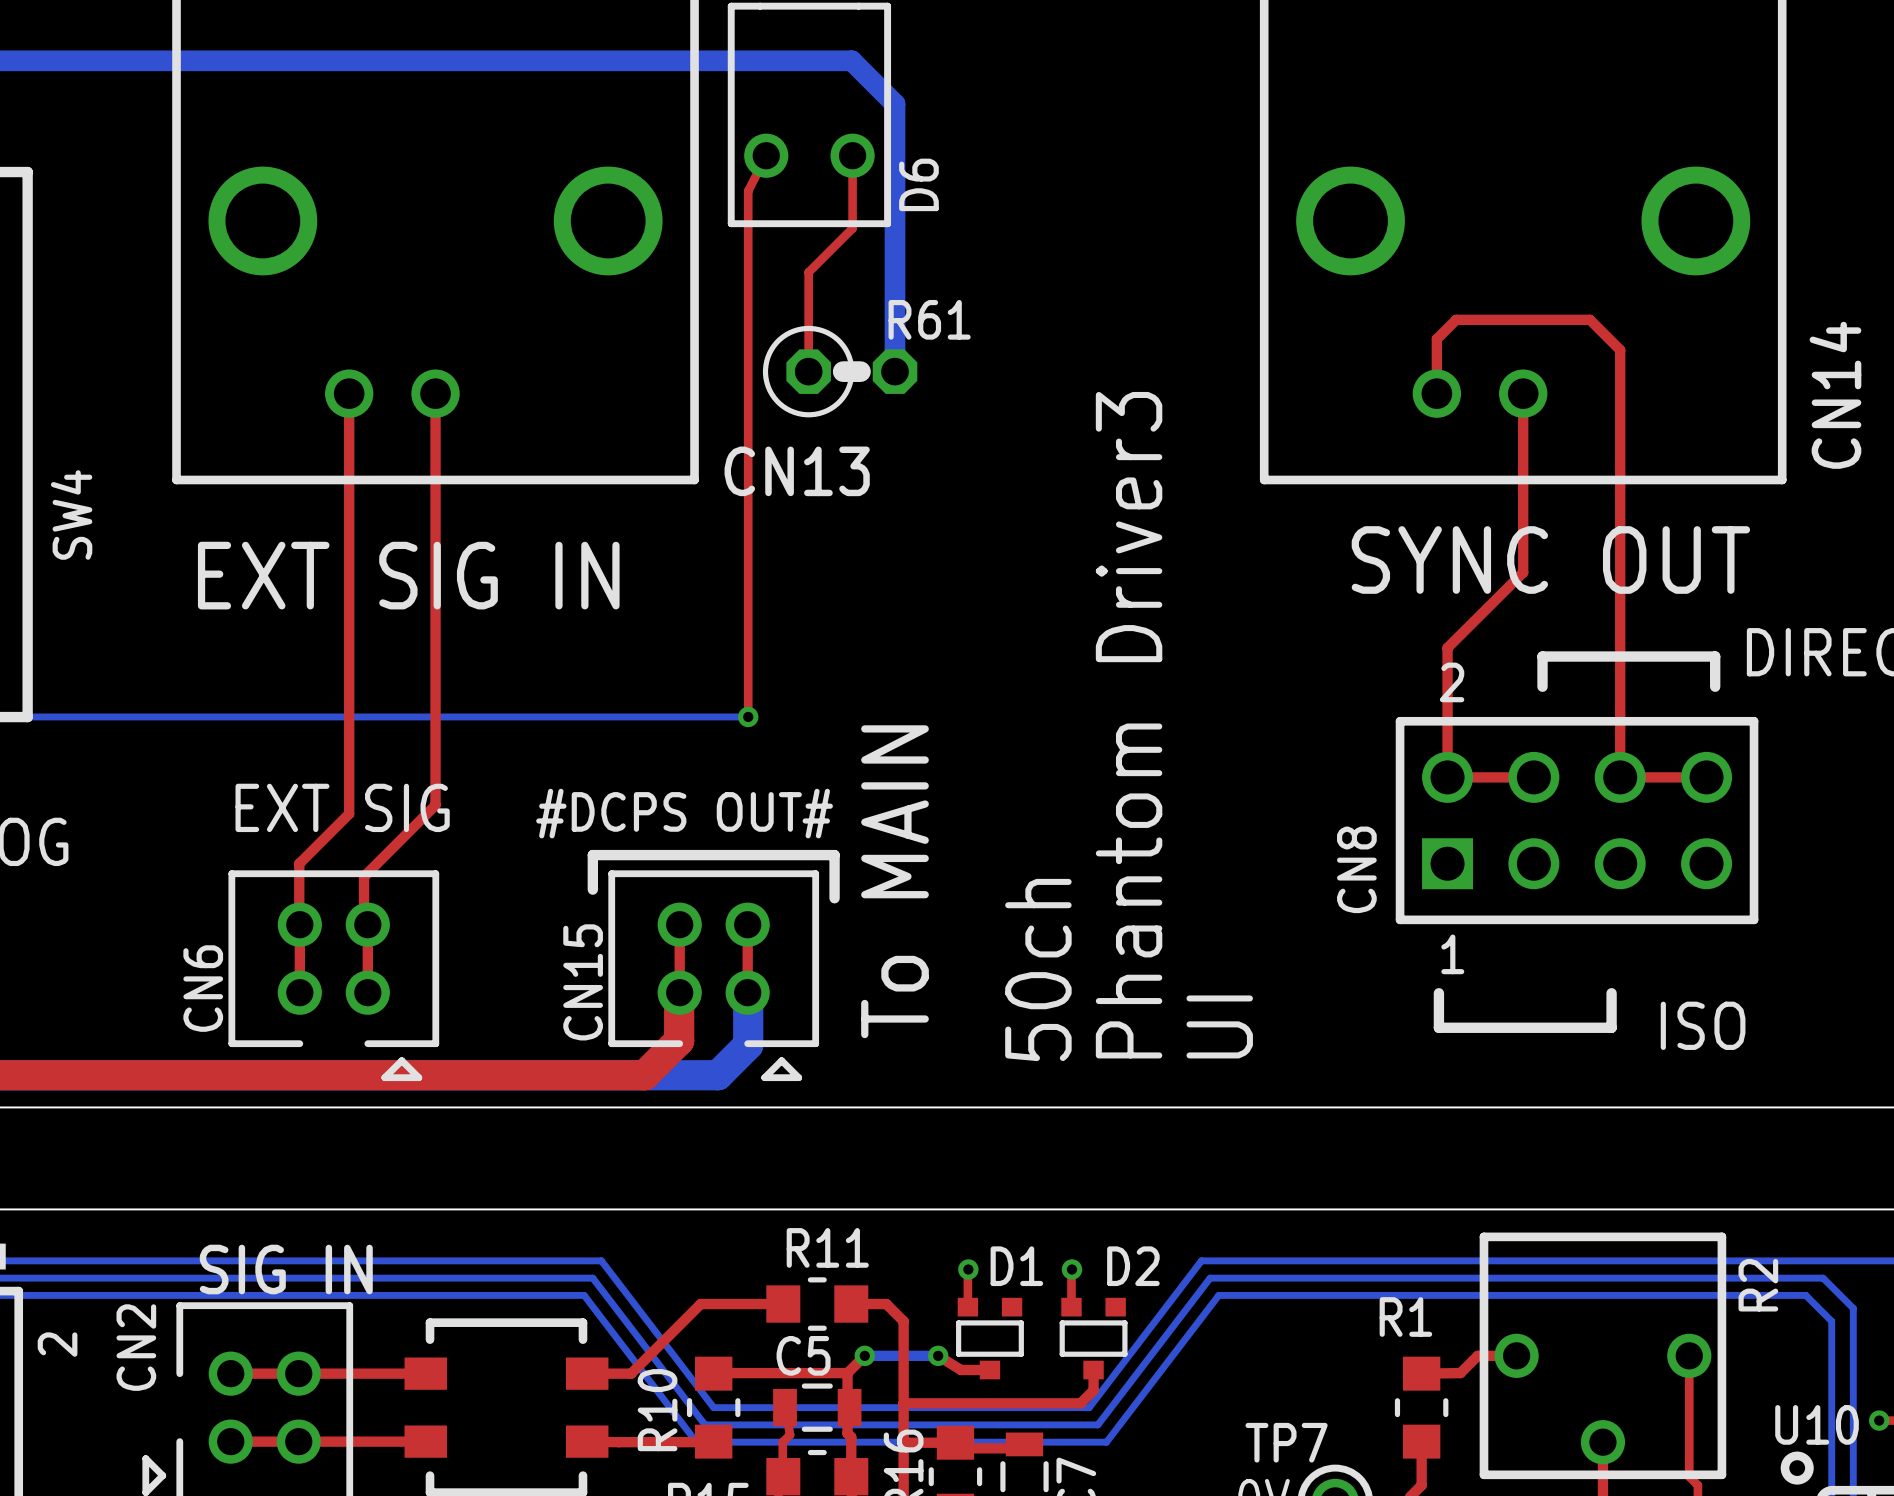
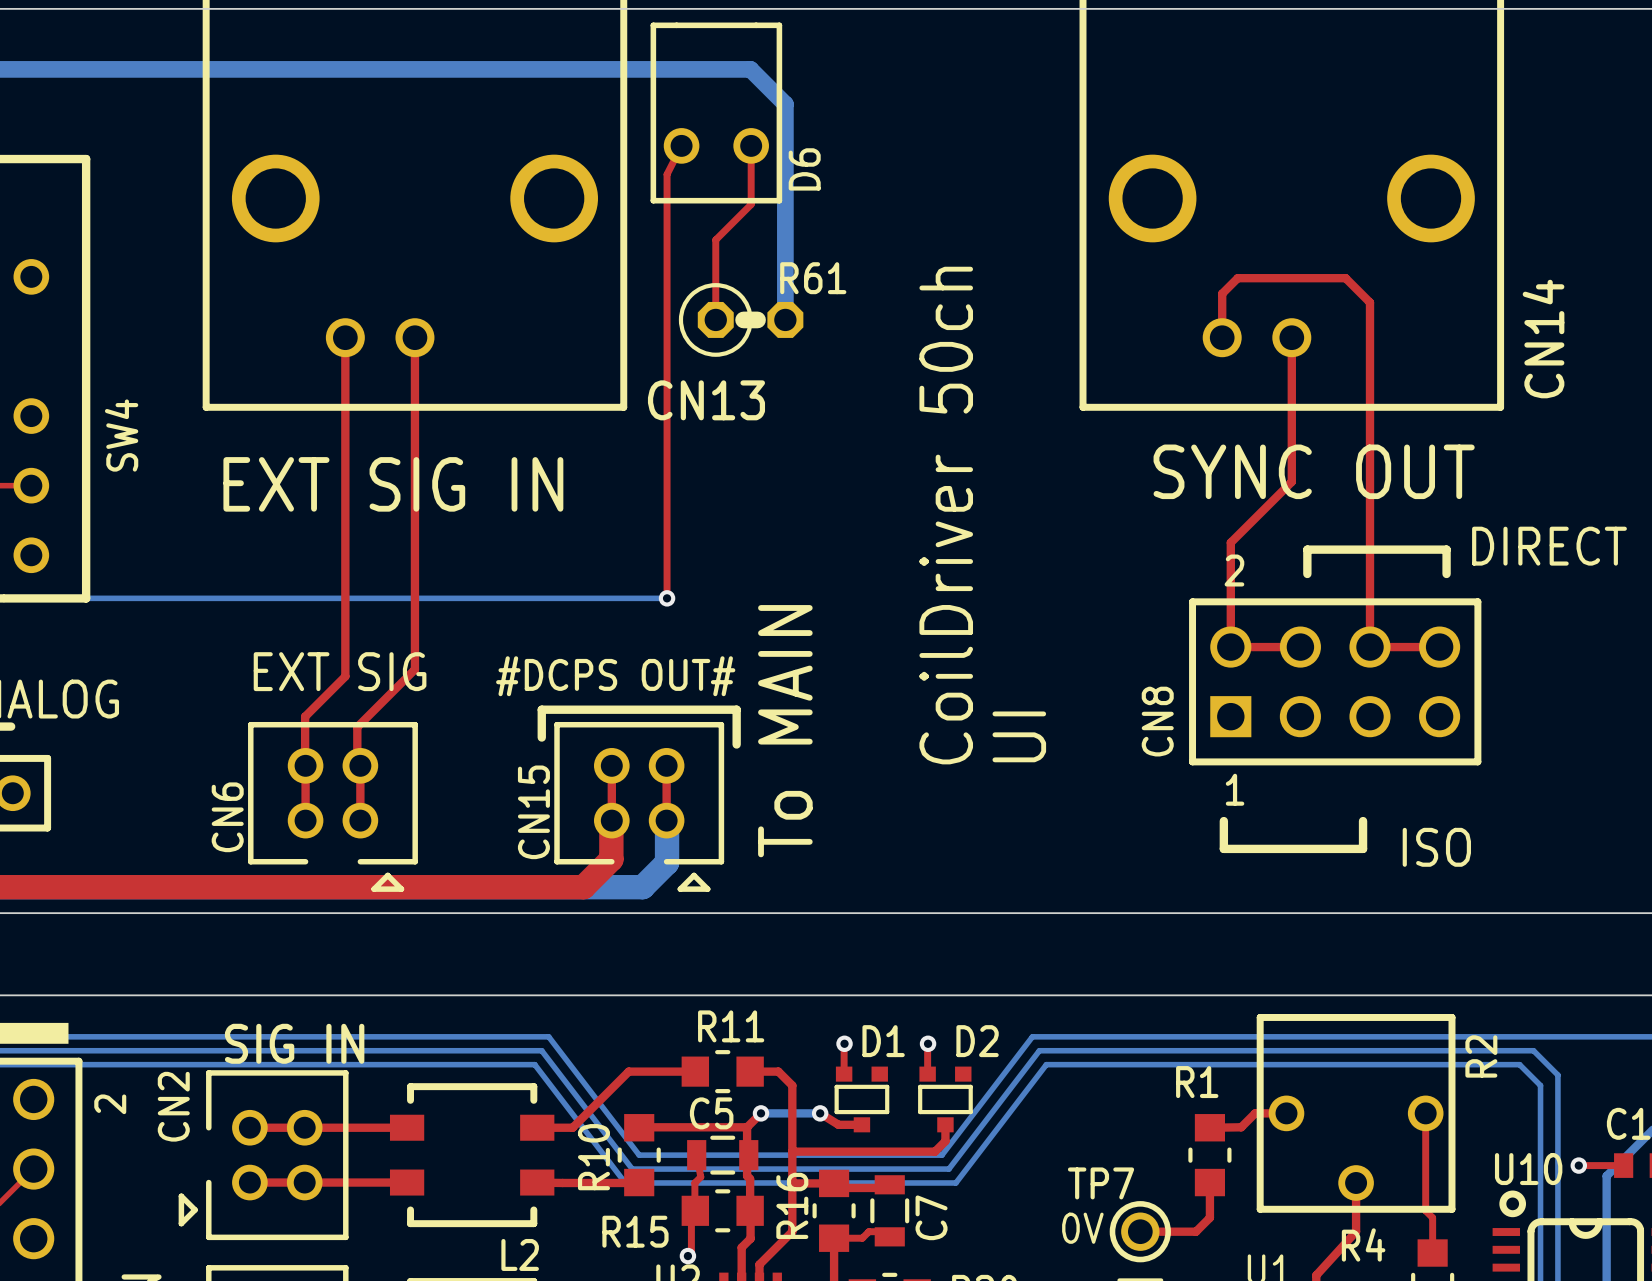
text: none -> CoilDriver 50ch (946, 515)
text: Phantom Driver3 (1129, 725) -> none
text: 50ch (1038, 969) -> none
text position: UI (1219, 1026) -> UI (1019, 736)

